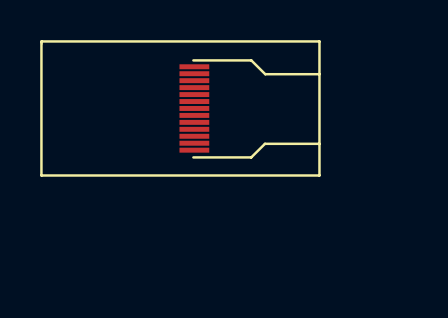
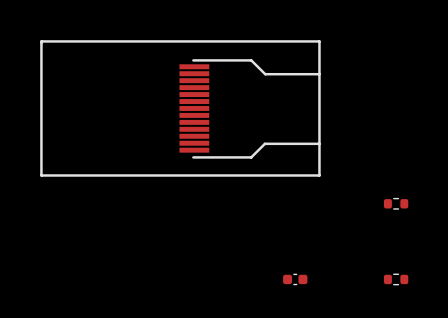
part: none -> (396, 203)
part: none -> (295, 279)
part: none -> (396, 279)

